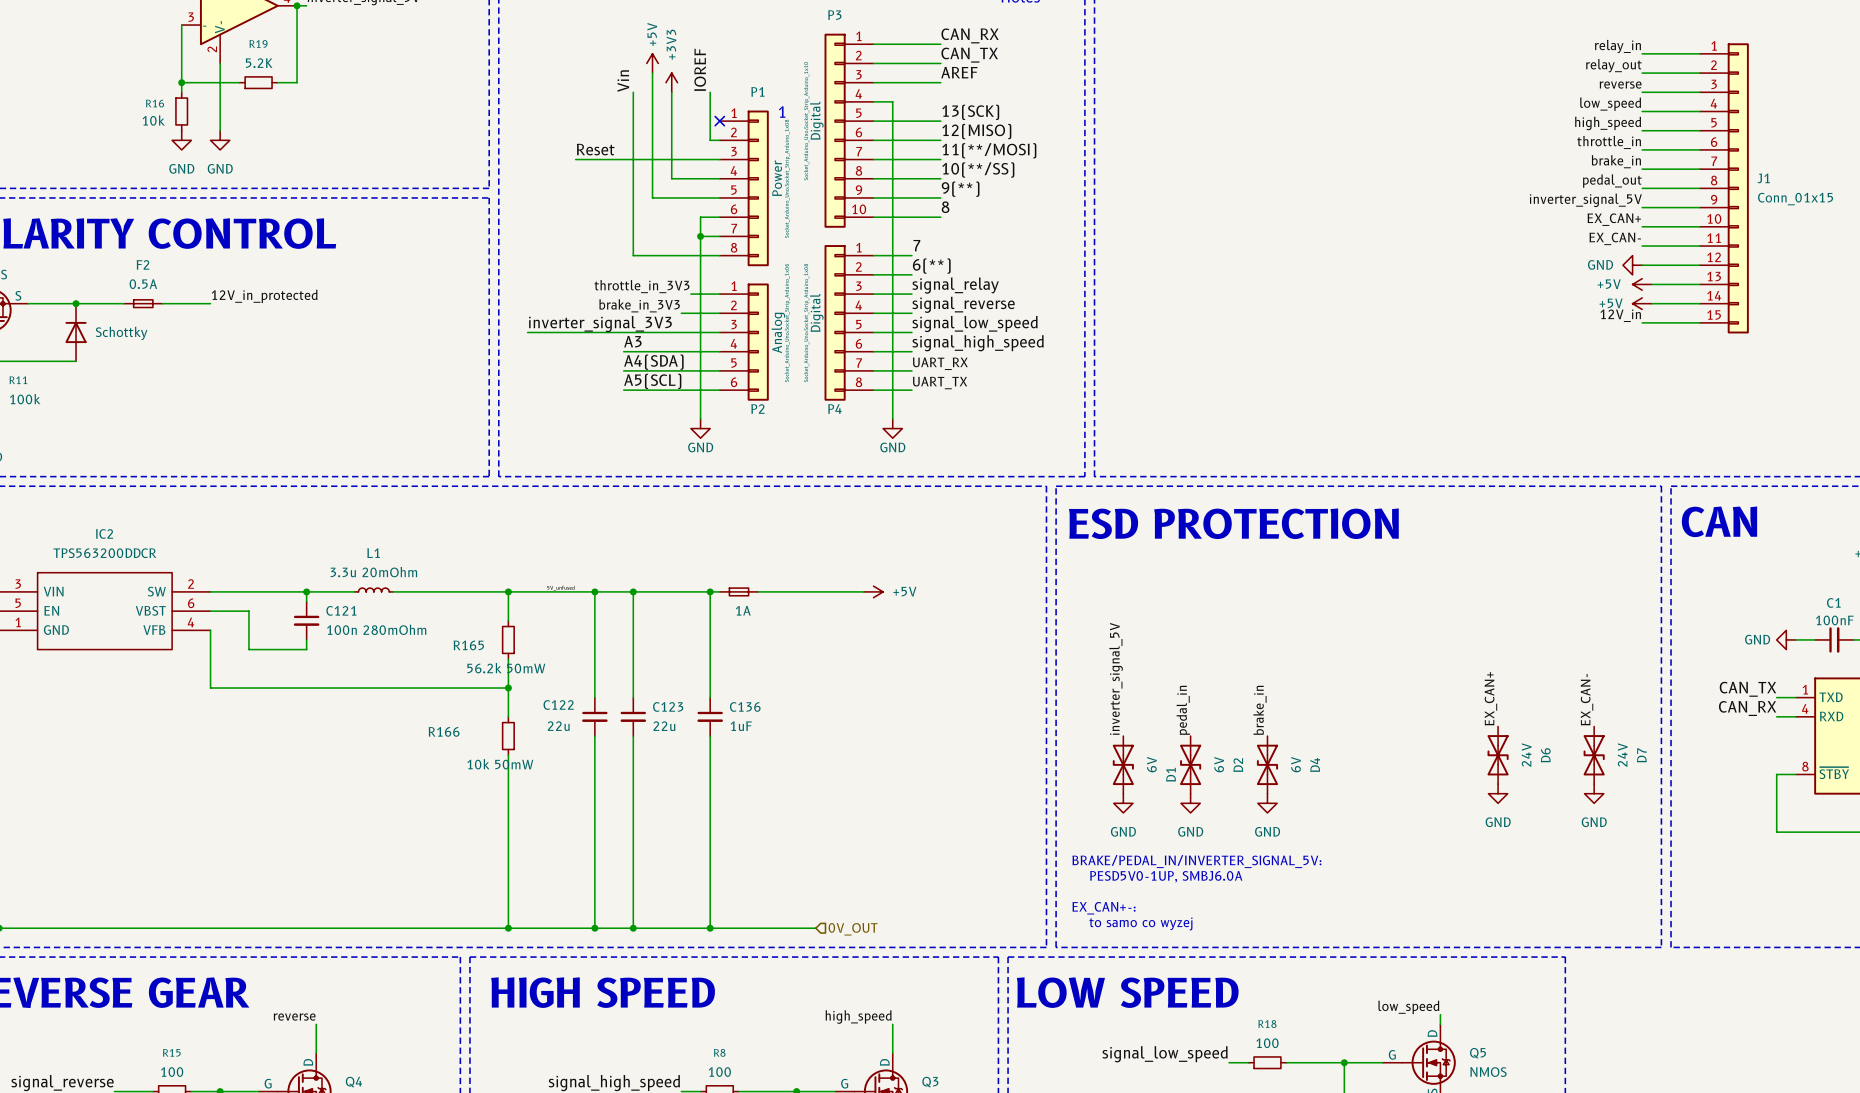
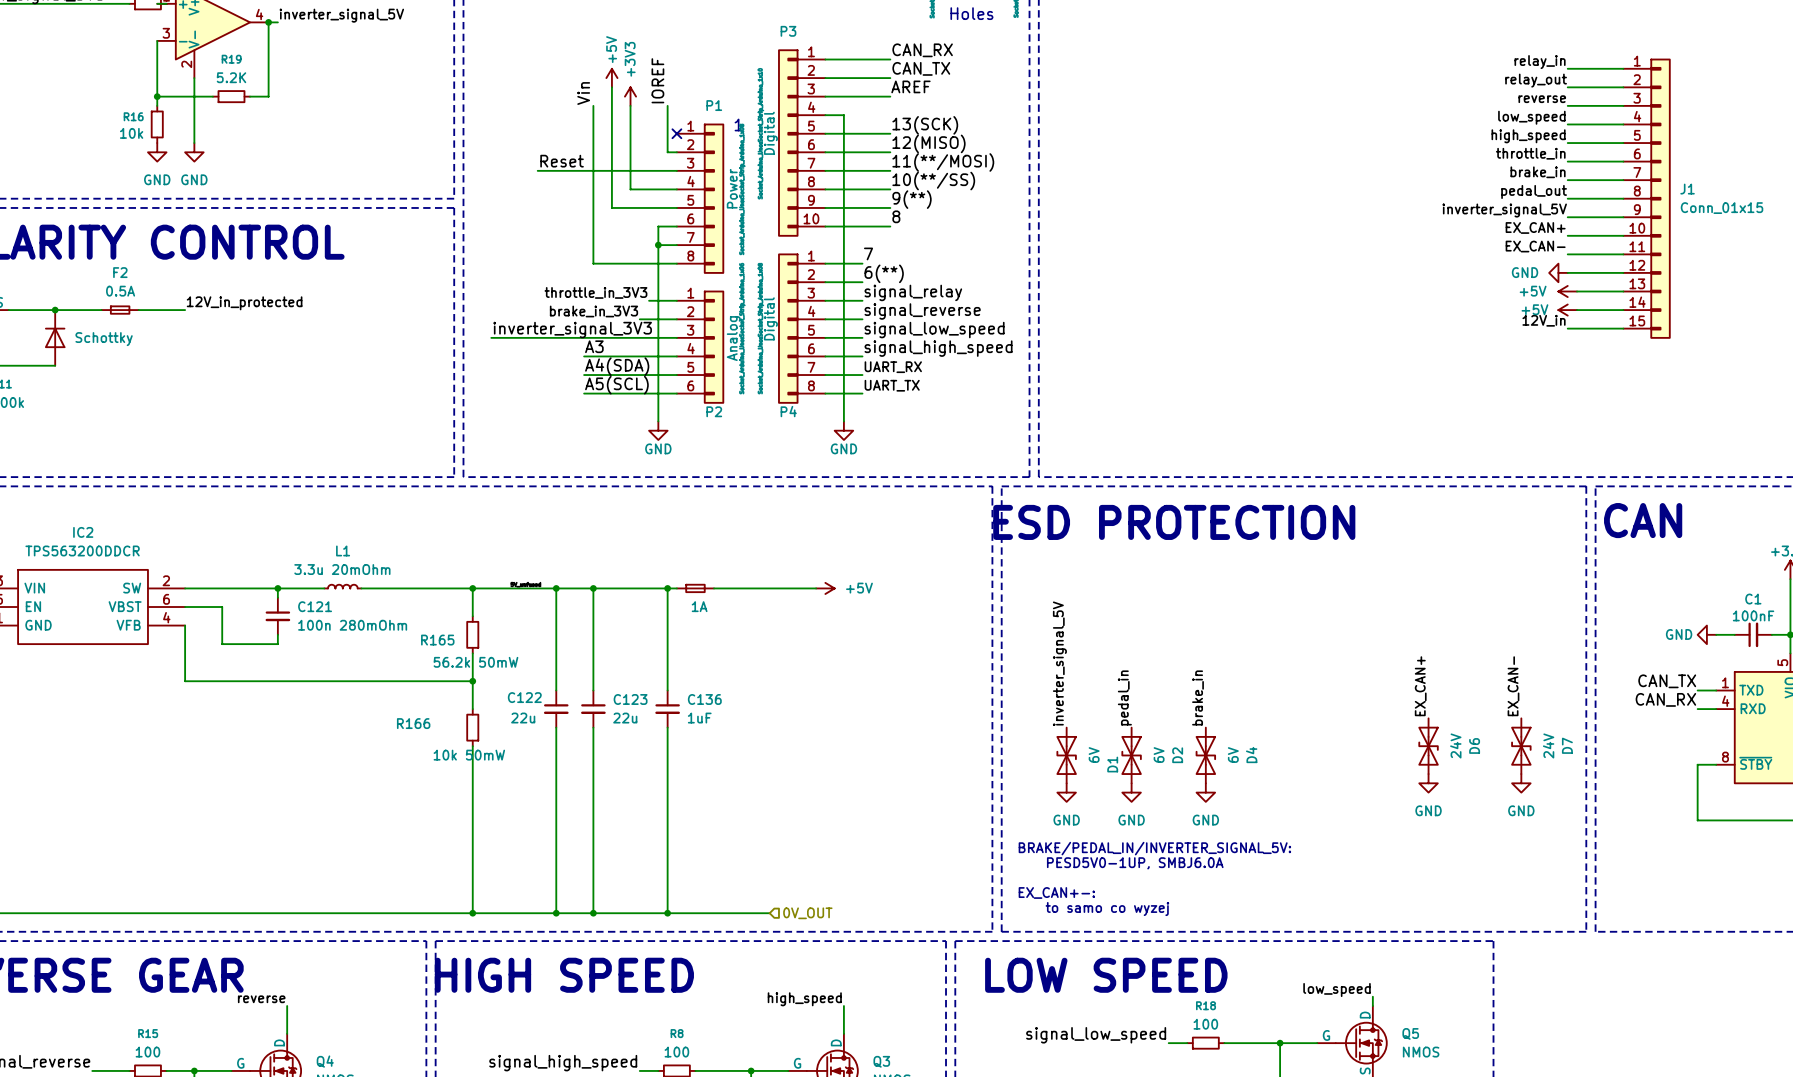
text position: LOW SPEED (1127, 992) -> LOW SPEED (1106, 975)

